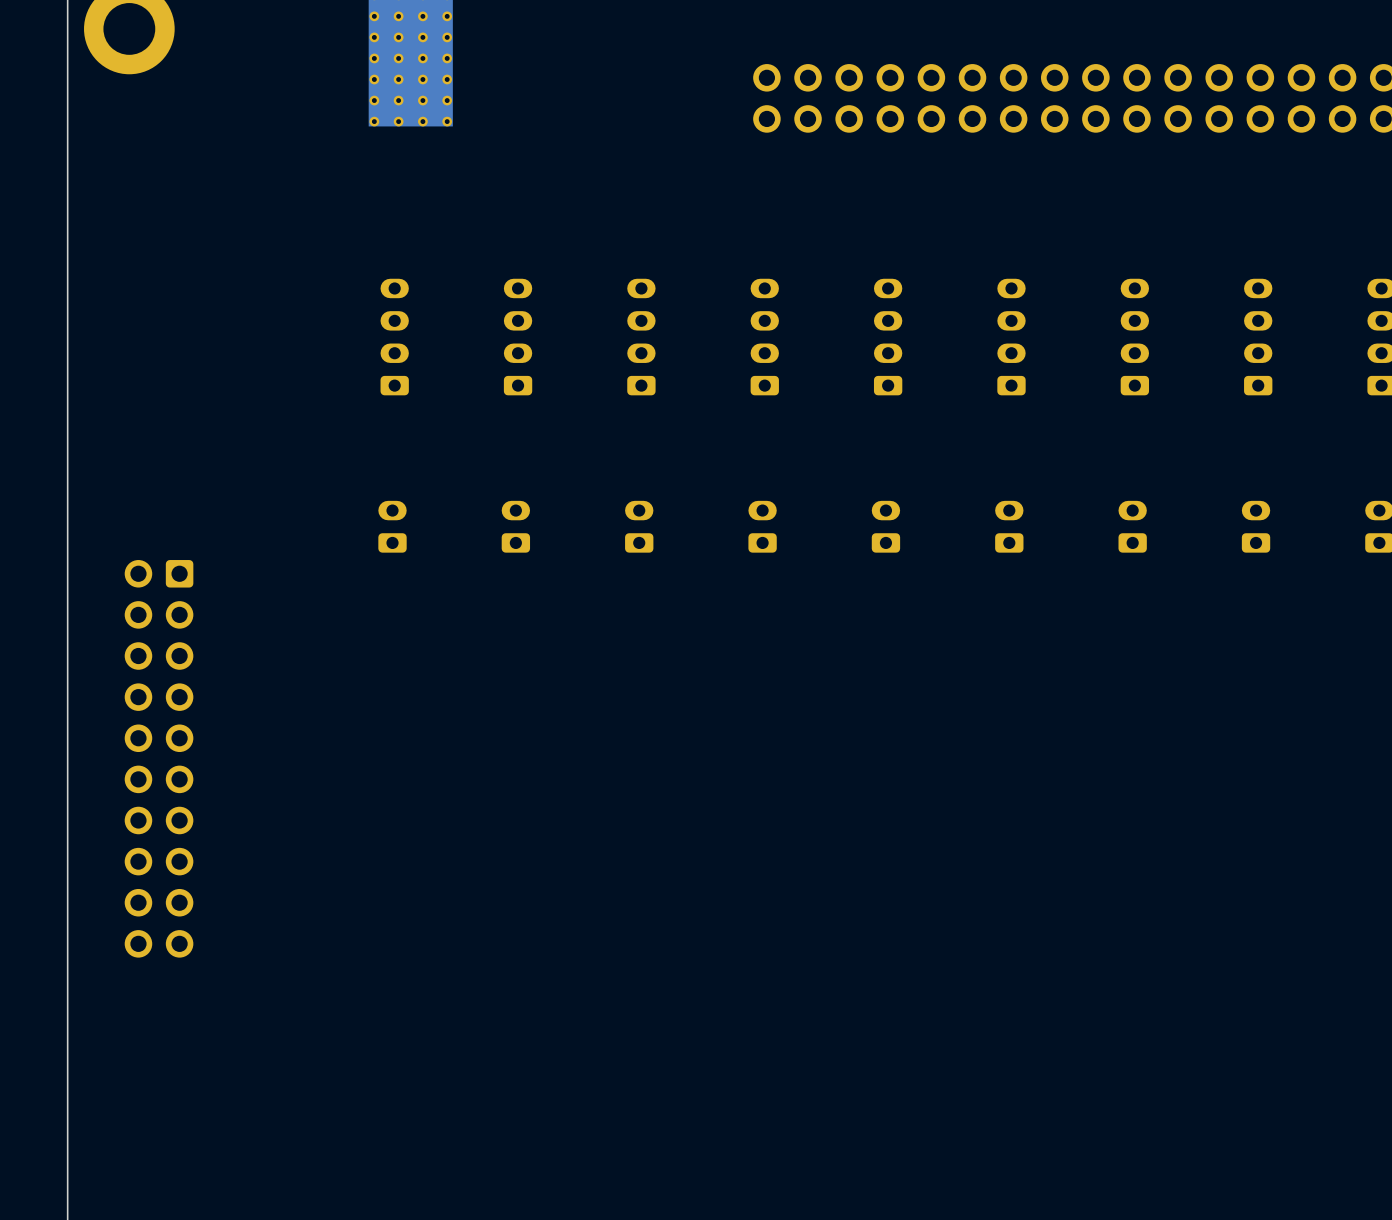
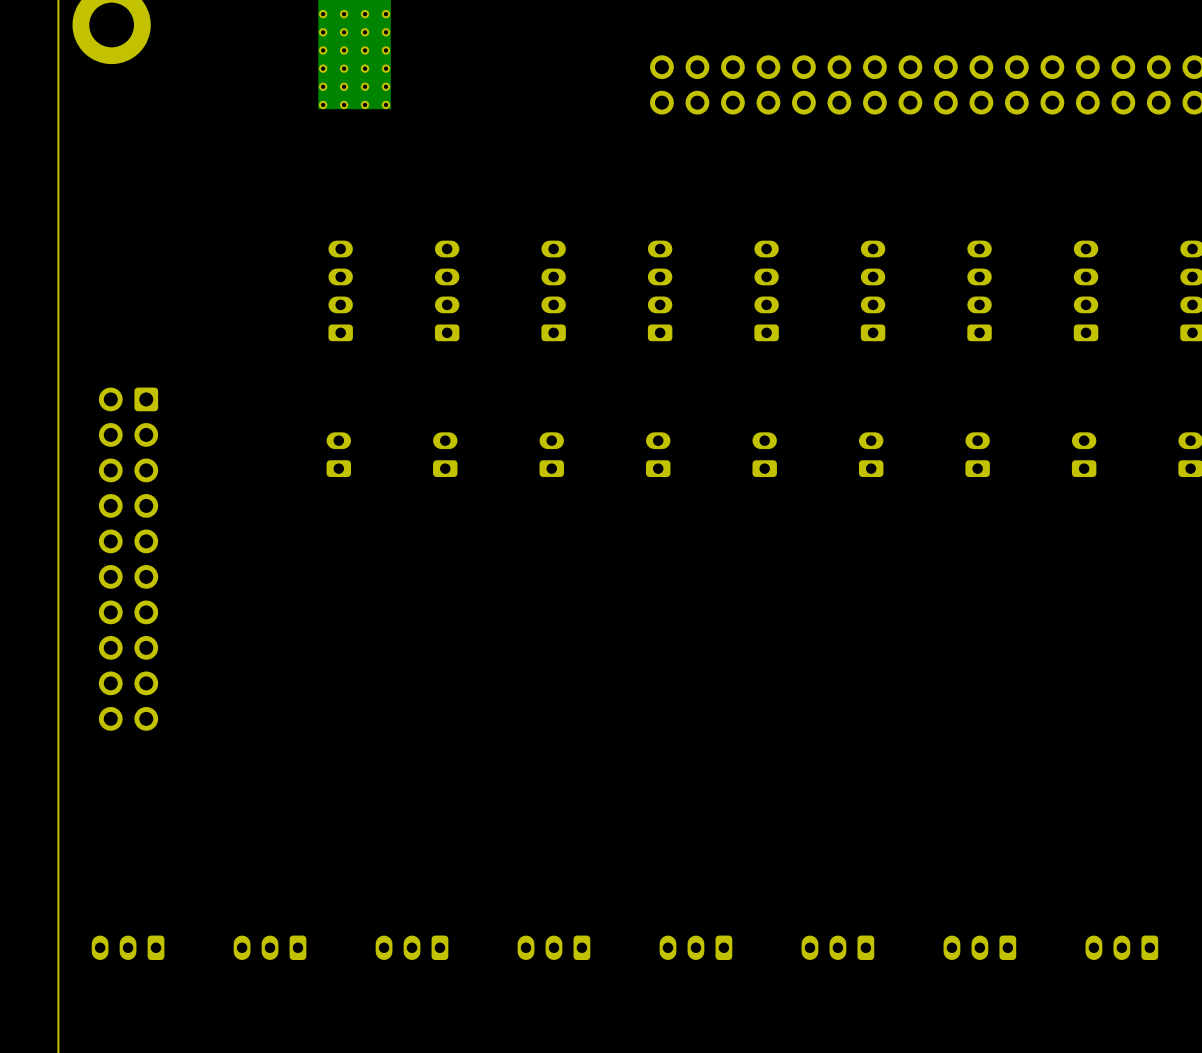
part position: (159, 758) -> (128, 559)
part: none -> (128, 947)
part: none -> (270, 947)
part: none -> (412, 947)
part: none -> (553, 947)
part: none -> (695, 947)
part: none -> (837, 947)
part: none -> (979, 947)
part: none -> (1121, 947)

